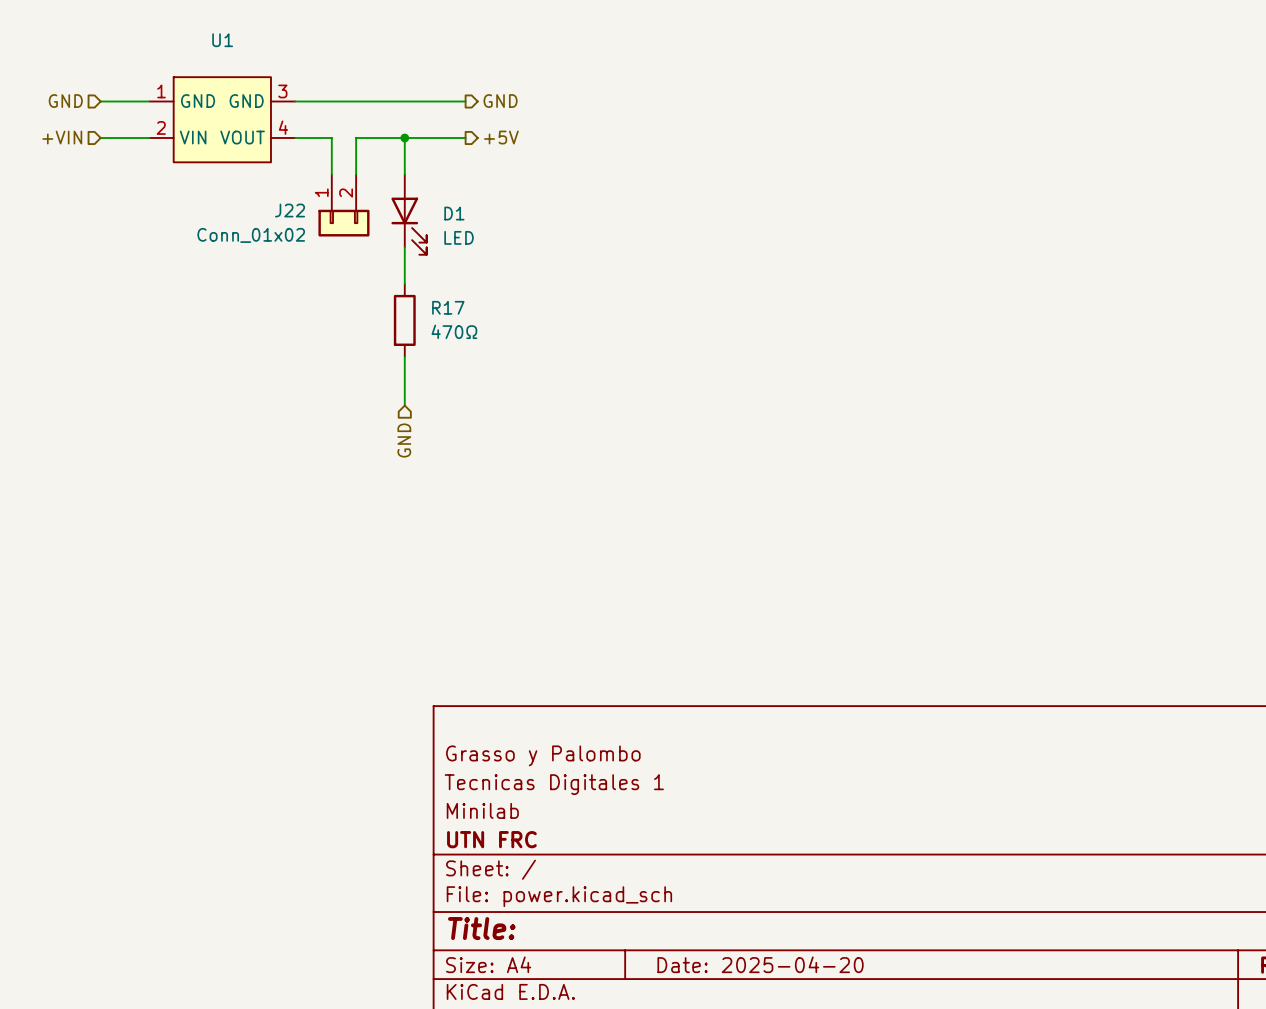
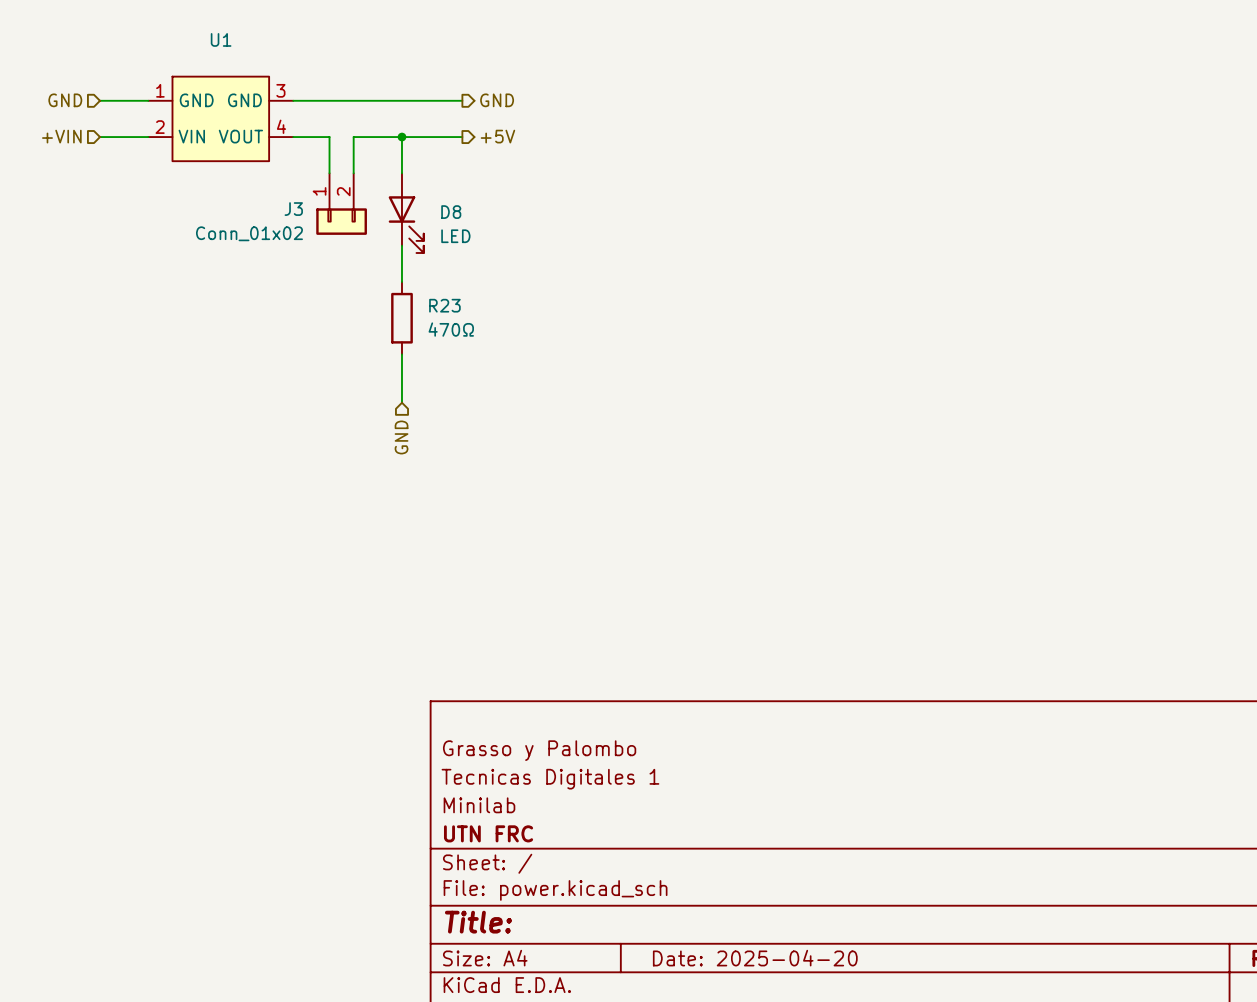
J22 name: J22 (290, 210) -> J3 (293, 209)
D1 name: D1 (454, 213) -> D8 (451, 212)
R17 name: R17 (448, 307) -> R23 (444, 305)

